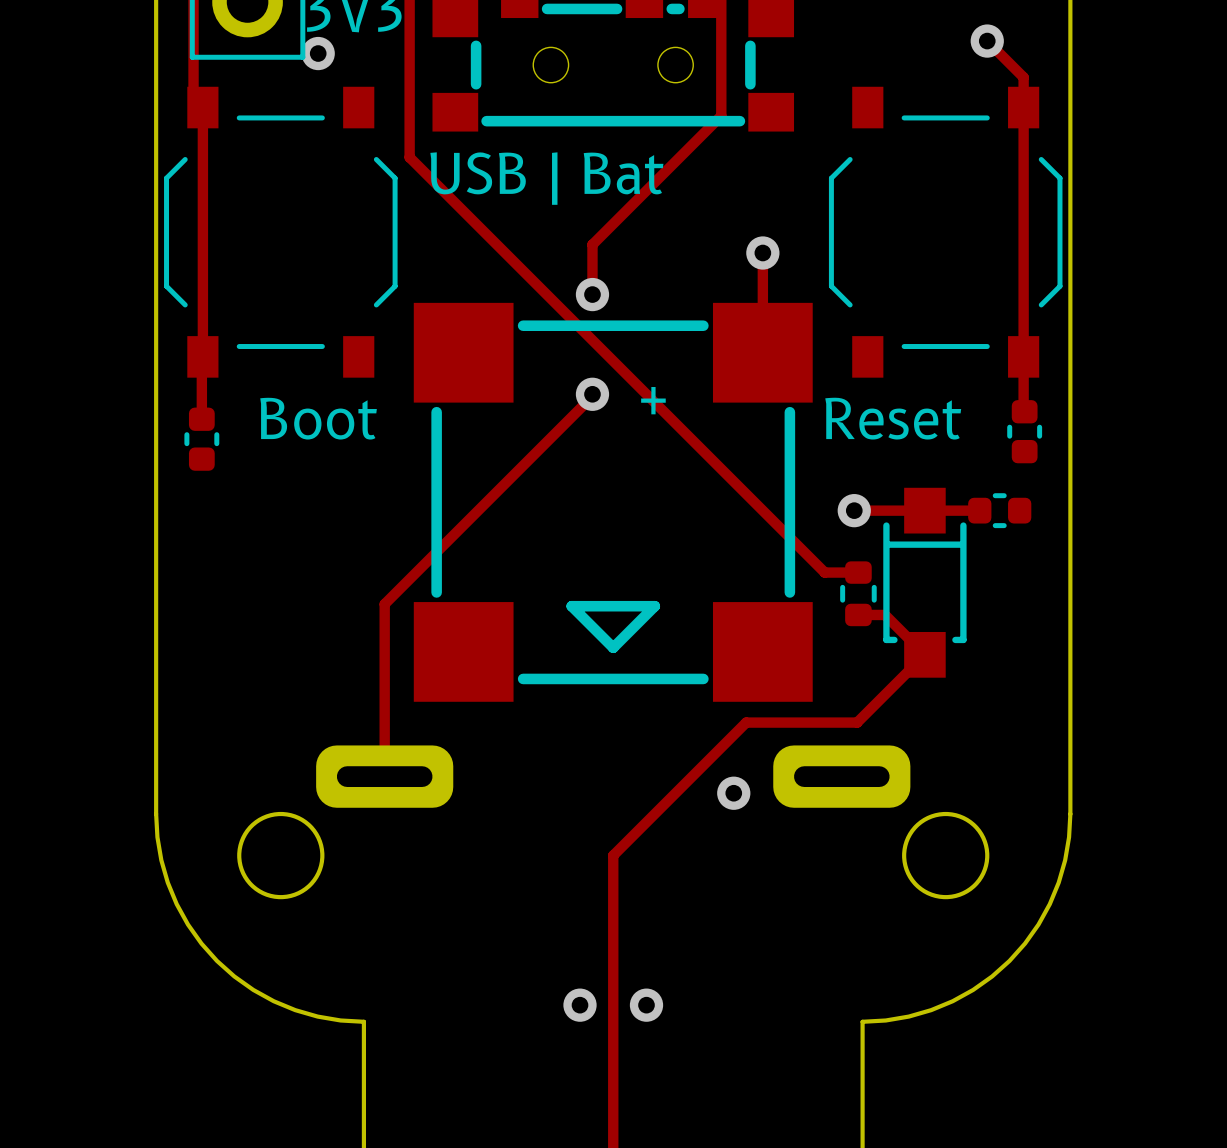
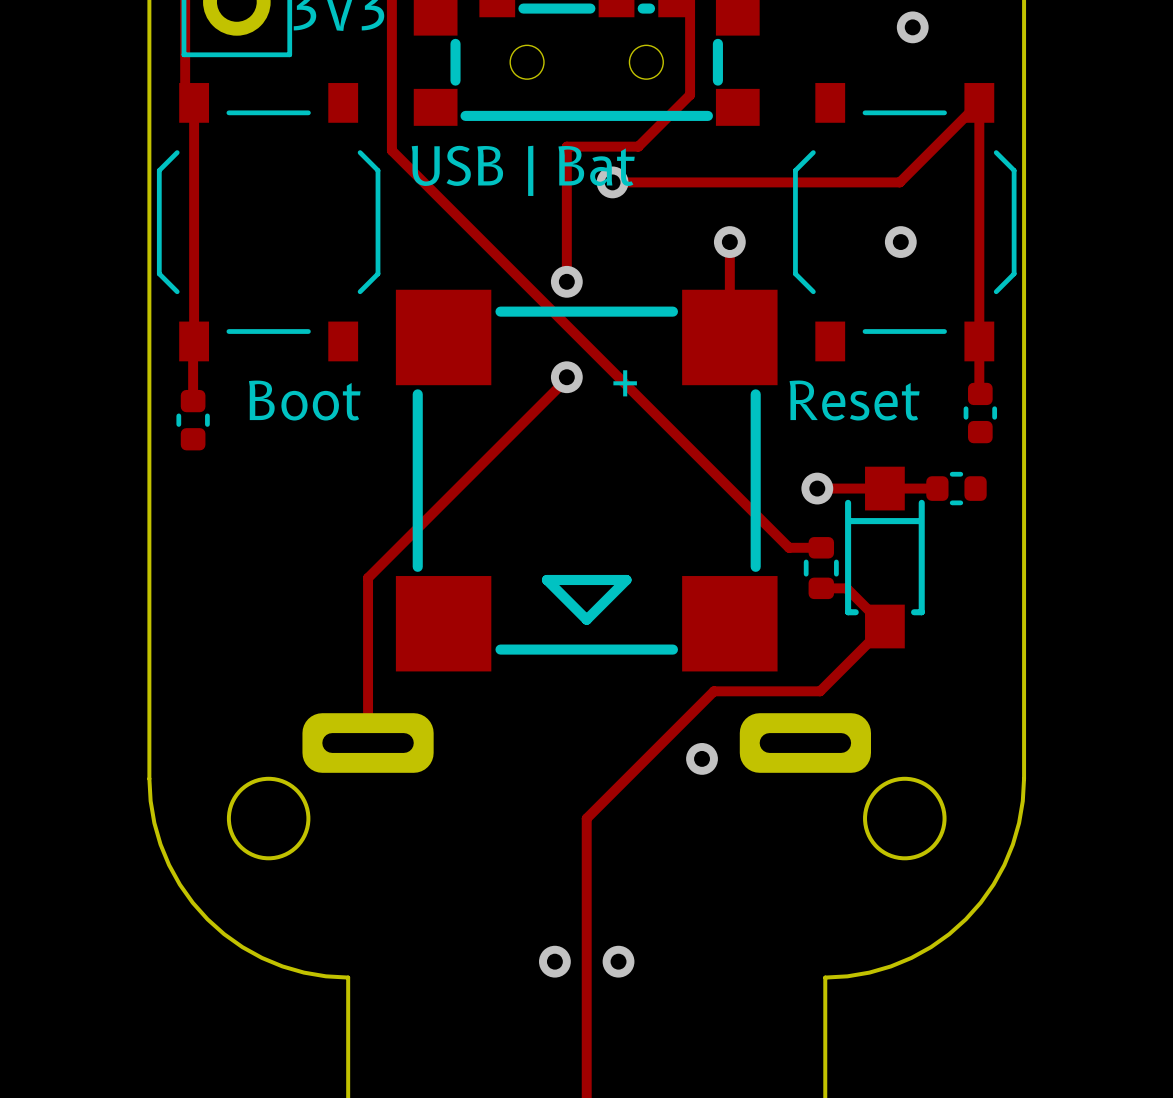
track: (987, 41) (1023, 77) (1023, 107) -> (612, 182) (899, 182) (979, 102)
via position: (987, 41) -> (912, 27)
via: (318, 53) -> none
track: (721, 99) (721, 115) (592, 244) -> (690, 94) (638, 146) (566, 146) (566, 234)
via: none -> (612, 182)
via: none -> (900, 242)

